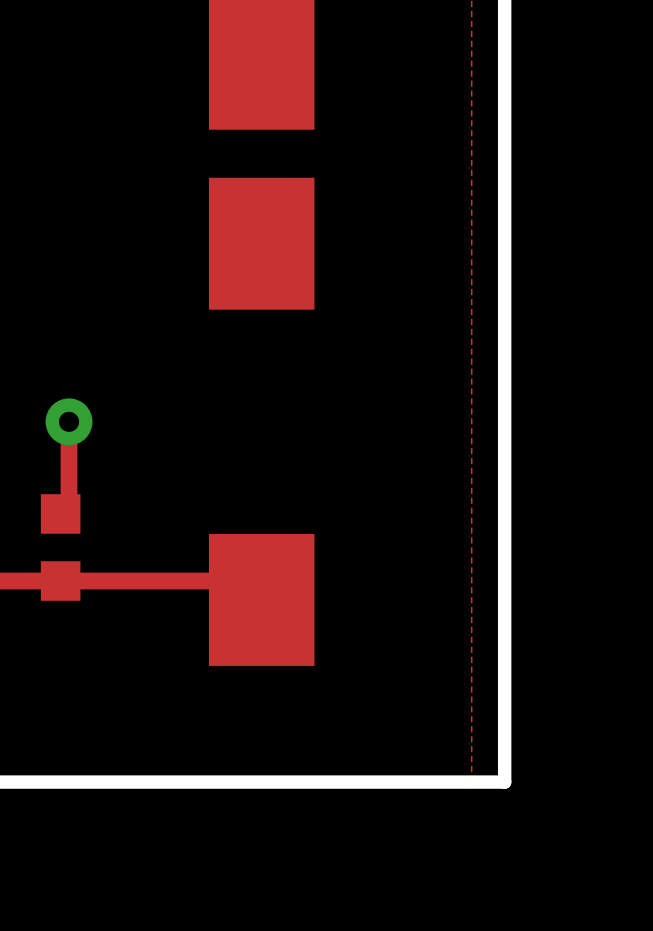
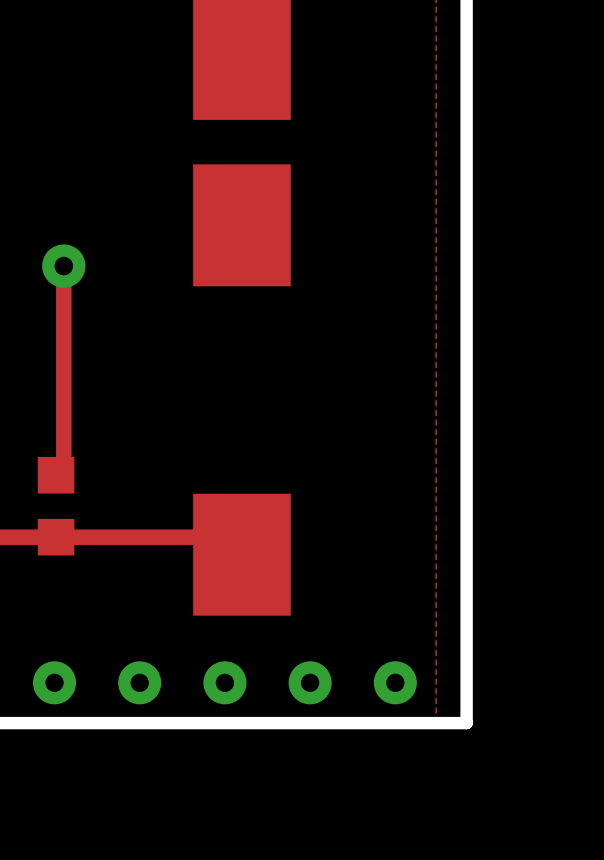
top track: none -> (63, 266) (63, 390)
via position: (69, 421) -> (63, 266)
via: none -> (54, 682)
via: none -> (139, 682)
via: none -> (224, 682)
via: none -> (310, 682)
via: none -> (395, 682)

